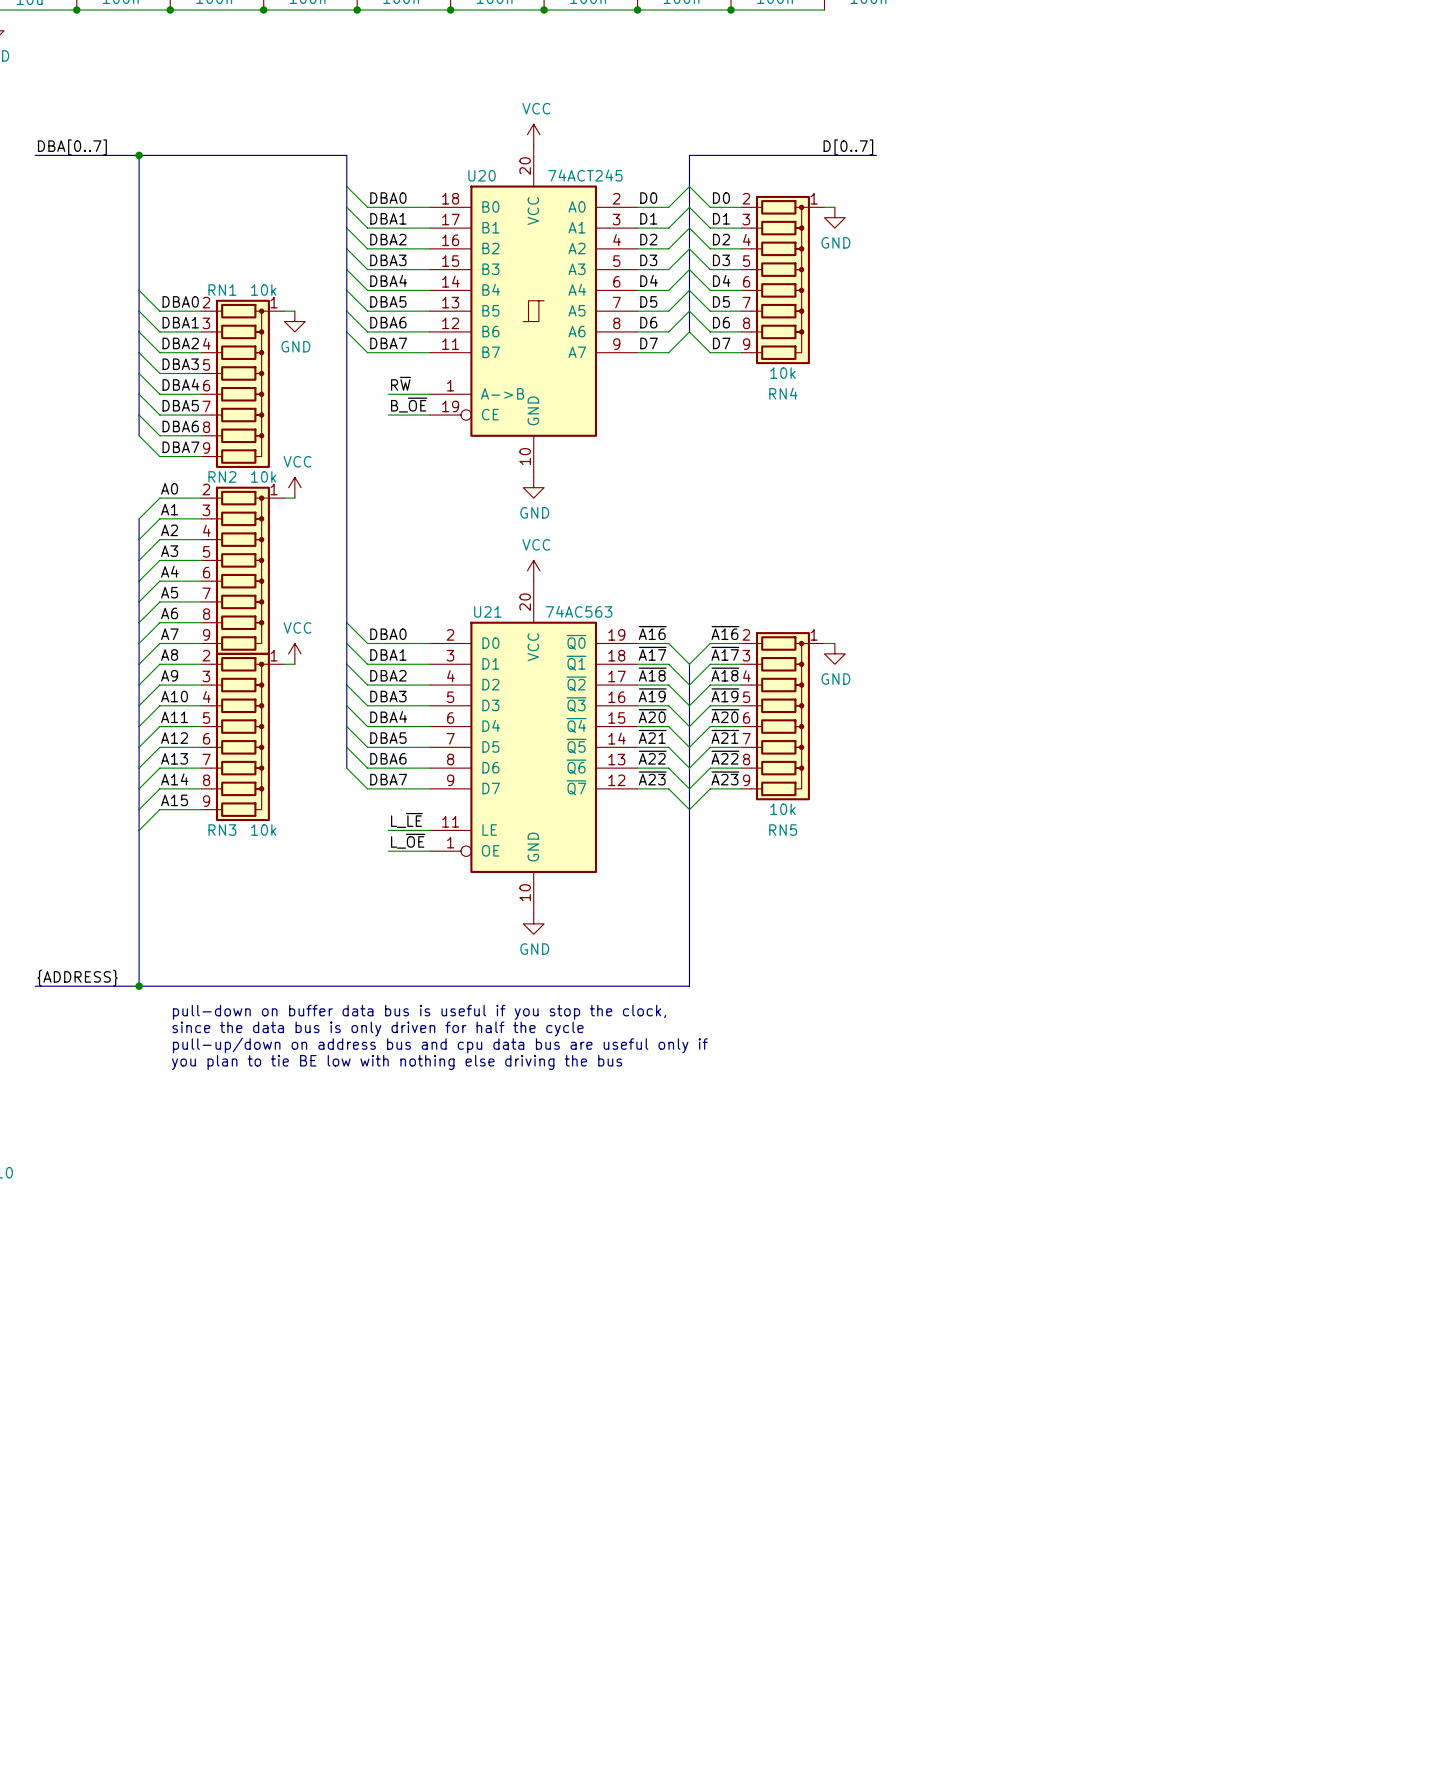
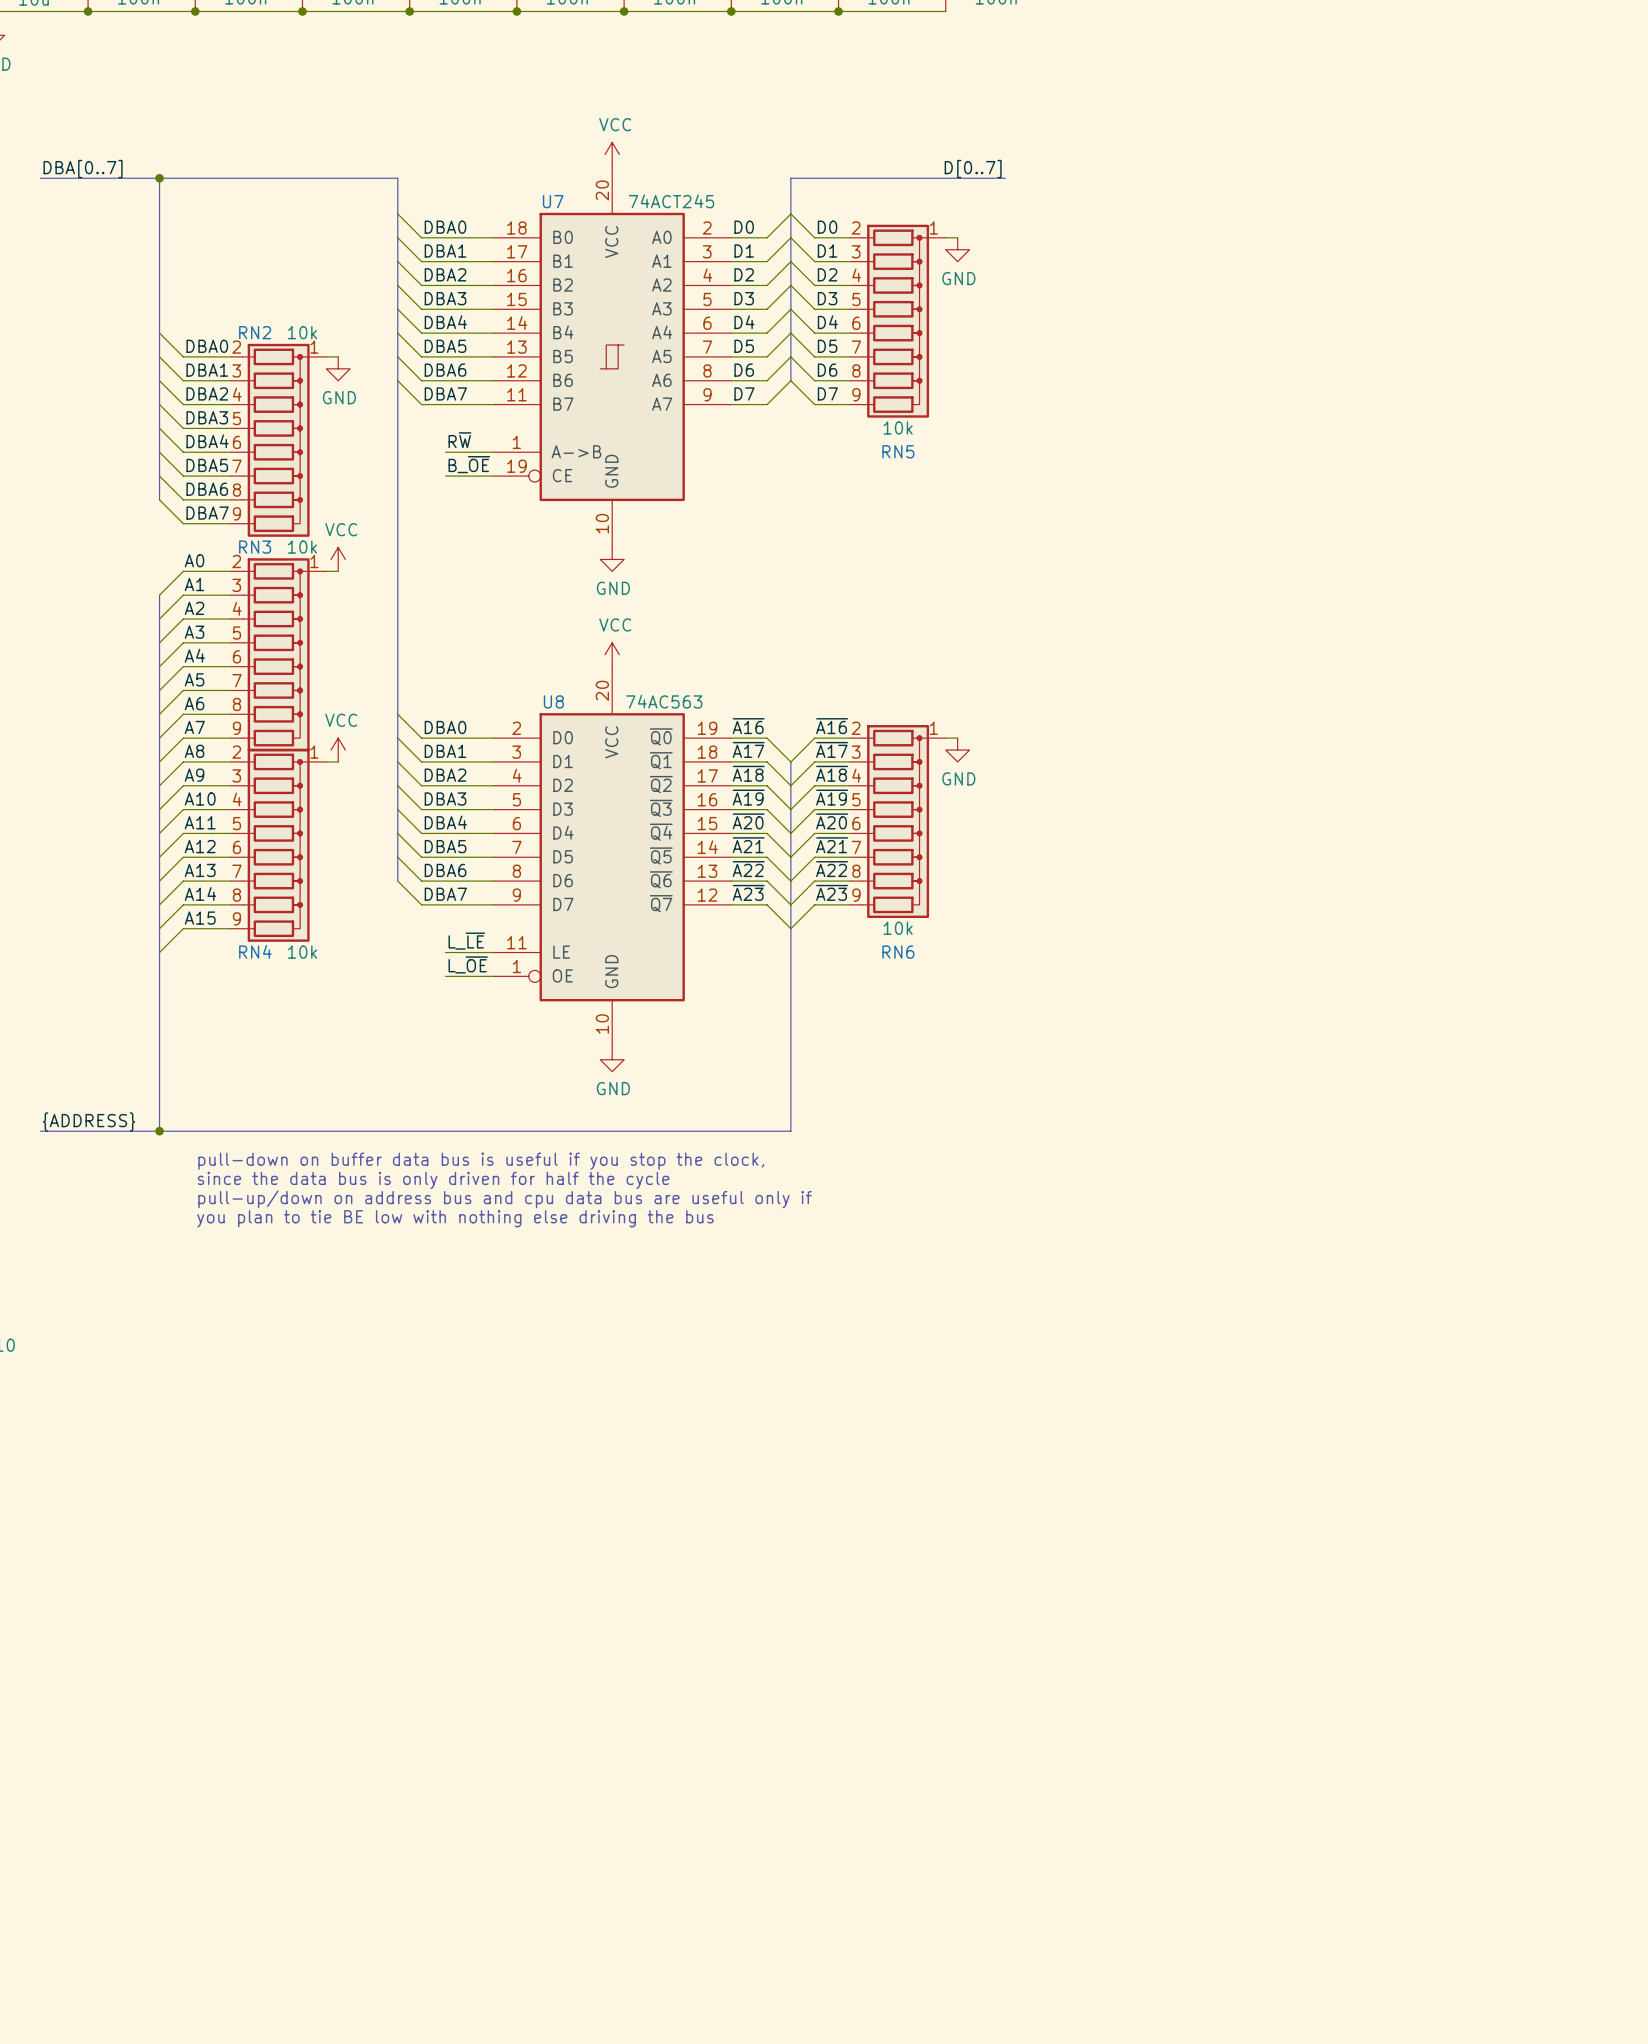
U20 name: U20 (482, 175) -> U7 (553, 201)
RN1 name: RN1 (222, 290) -> RN2 (255, 332)
RN4 name: RN4 (783, 393) -> RN5 (898, 451)
RN2 name: RN2 (222, 476) -> RN3 (255, 547)
U21 name: U21 (487, 611) -> U8 (553, 701)
RN3 name: RN3 (222, 830) -> RN4 (255, 951)
RN5 name: RN5 (783, 830) -> RN6 (898, 952)

